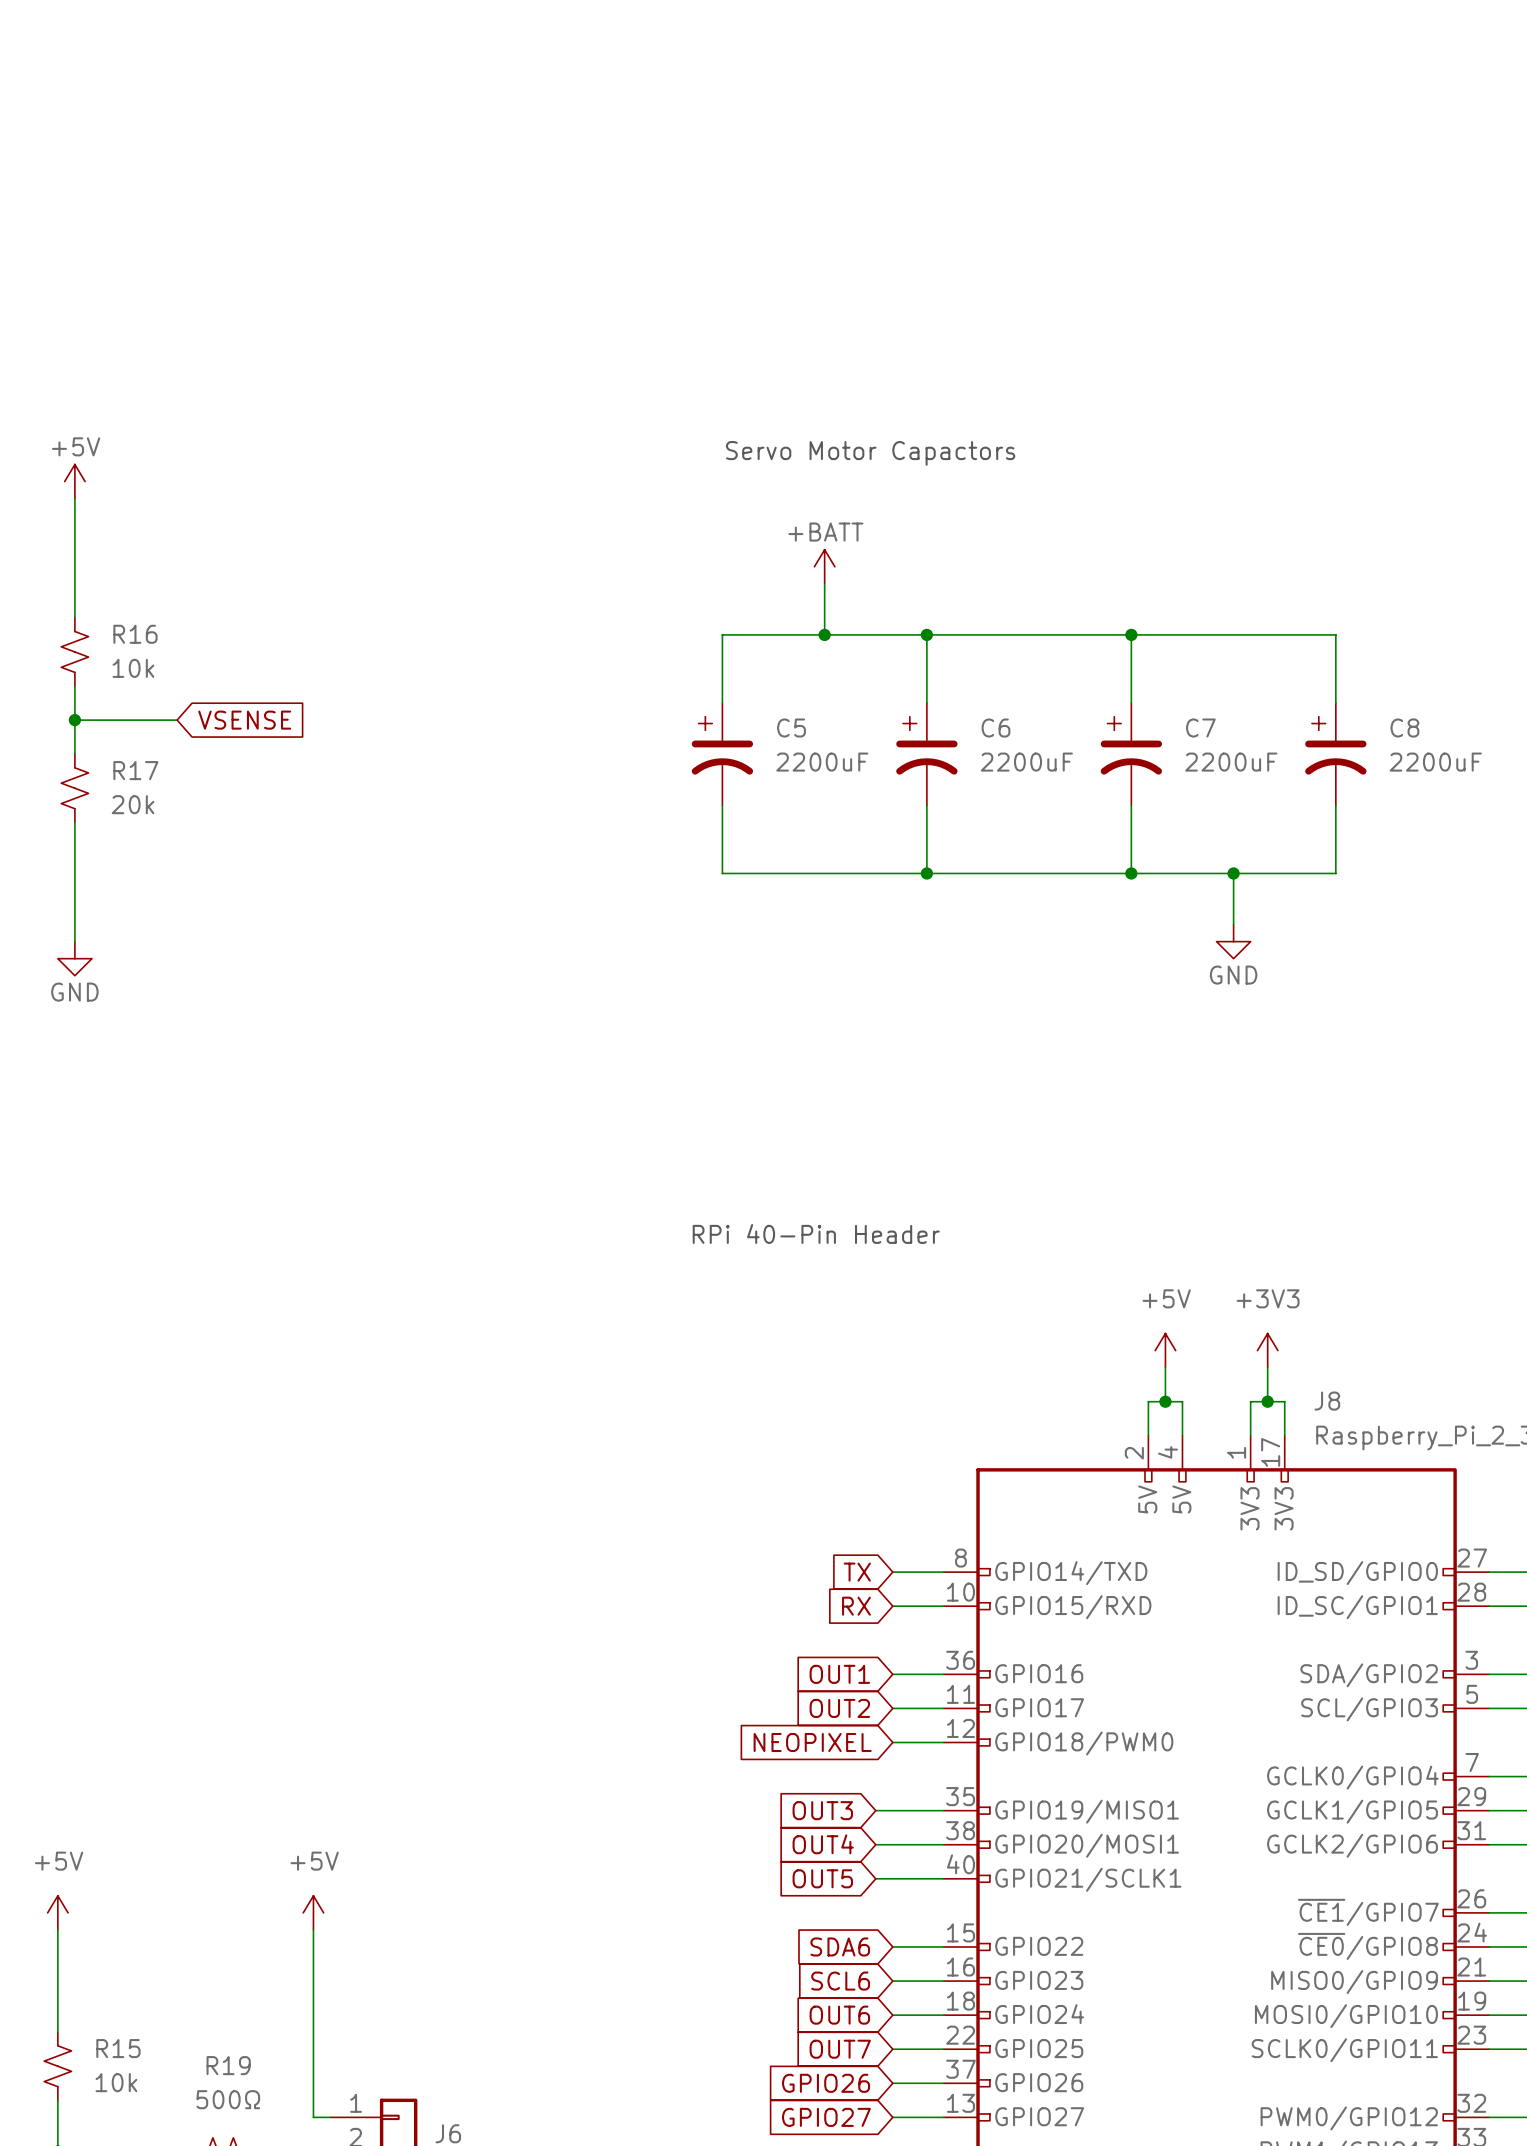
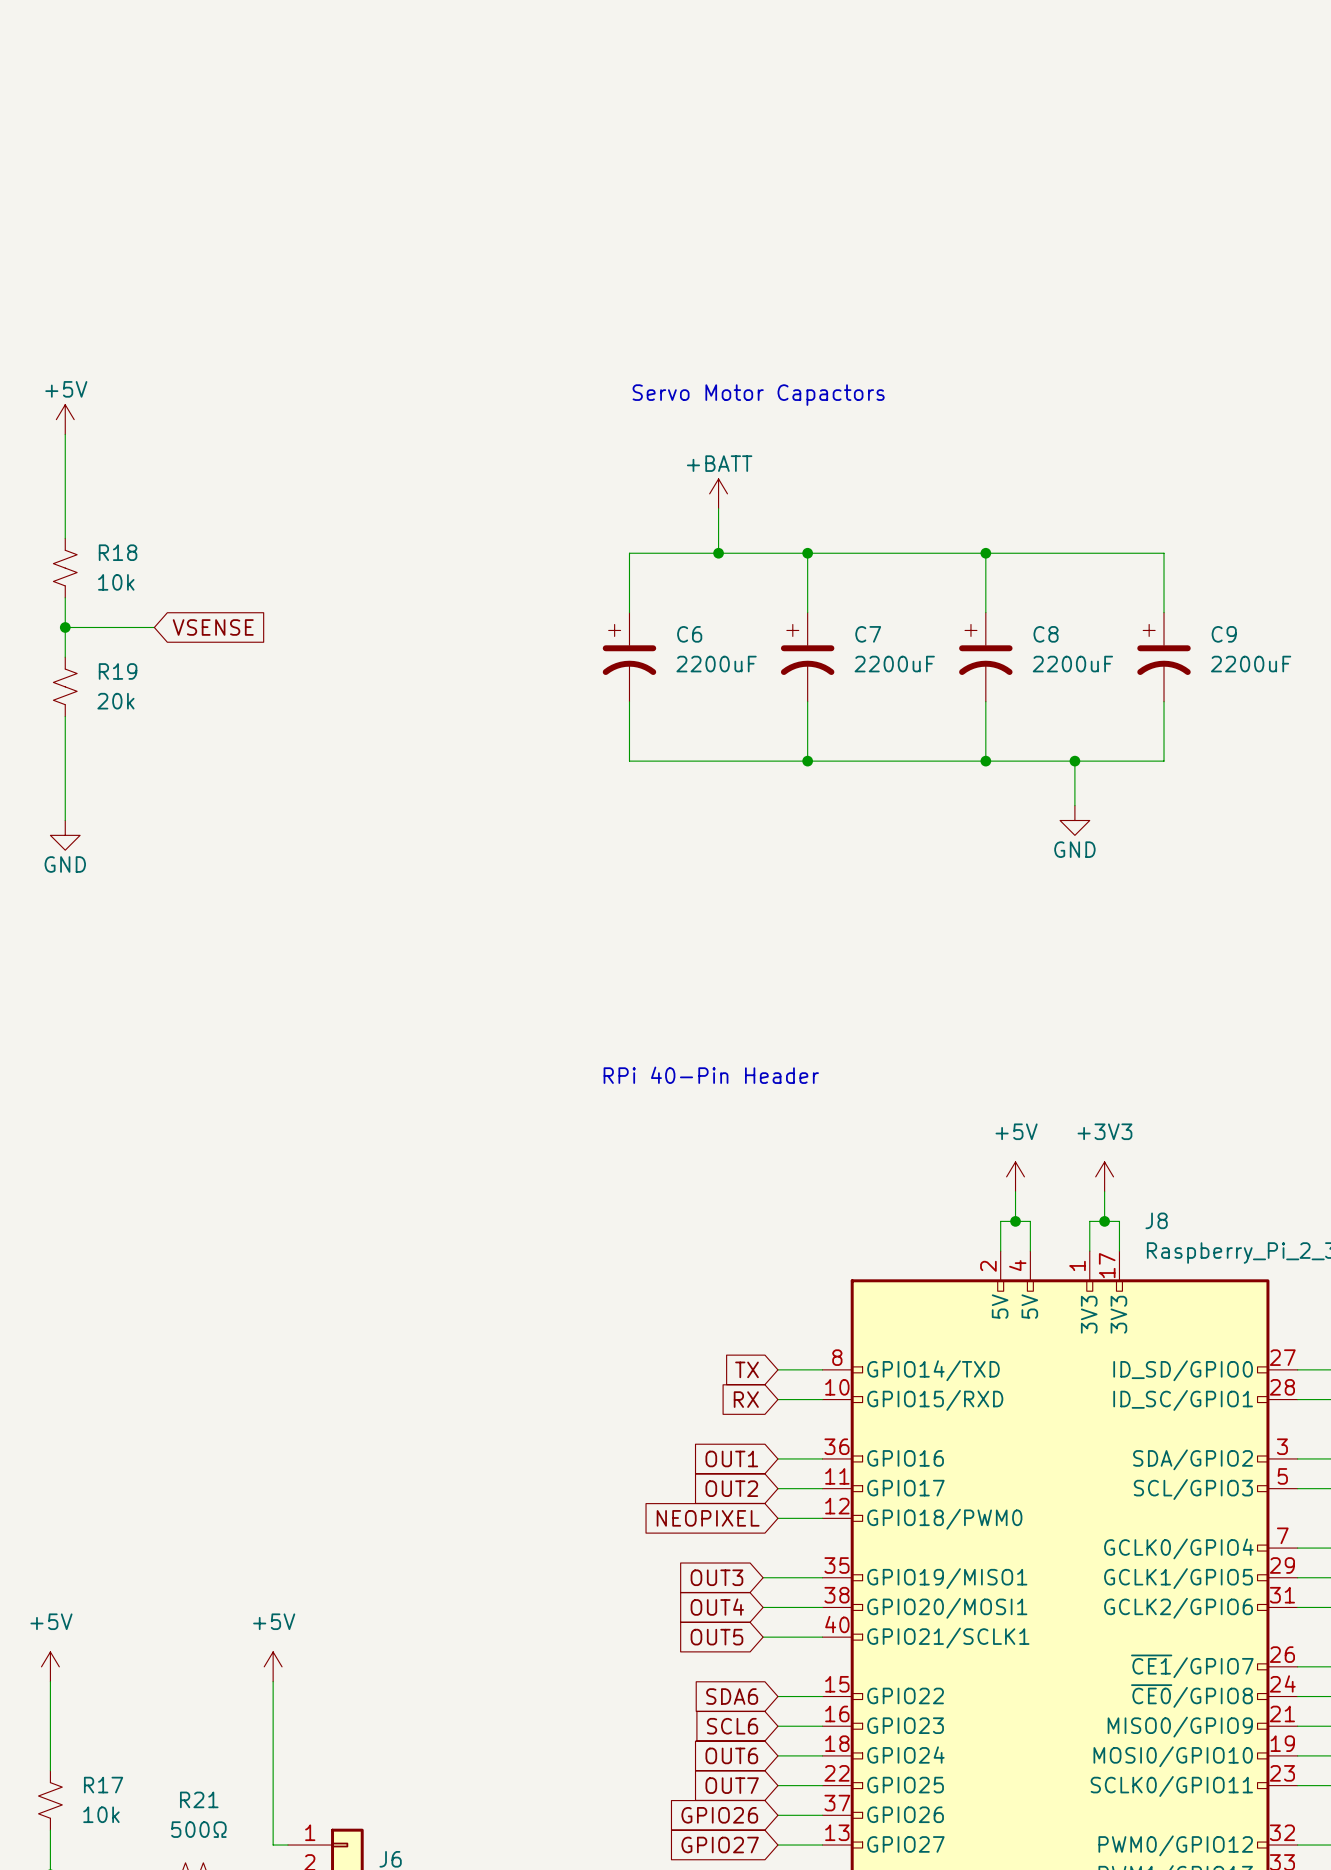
R16 name: R16 (135, 634) -> R18 (118, 552)
C5 name: C5 (791, 728) -> C6 (689, 634)
C6 name: C6 (995, 728) -> C7 (868, 634)
C7 name: C7 (1200, 728) -> C8 (1046, 634)
C8 name: C8 (1404, 728) -> C9 (1224, 634)
R17 name: R17 (135, 770) -> R19 (118, 671)
R15 name: R15 (118, 2048) -> R17 (103, 1785)
R19 name: R19 (228, 2065) -> R21 (199, 1799)

